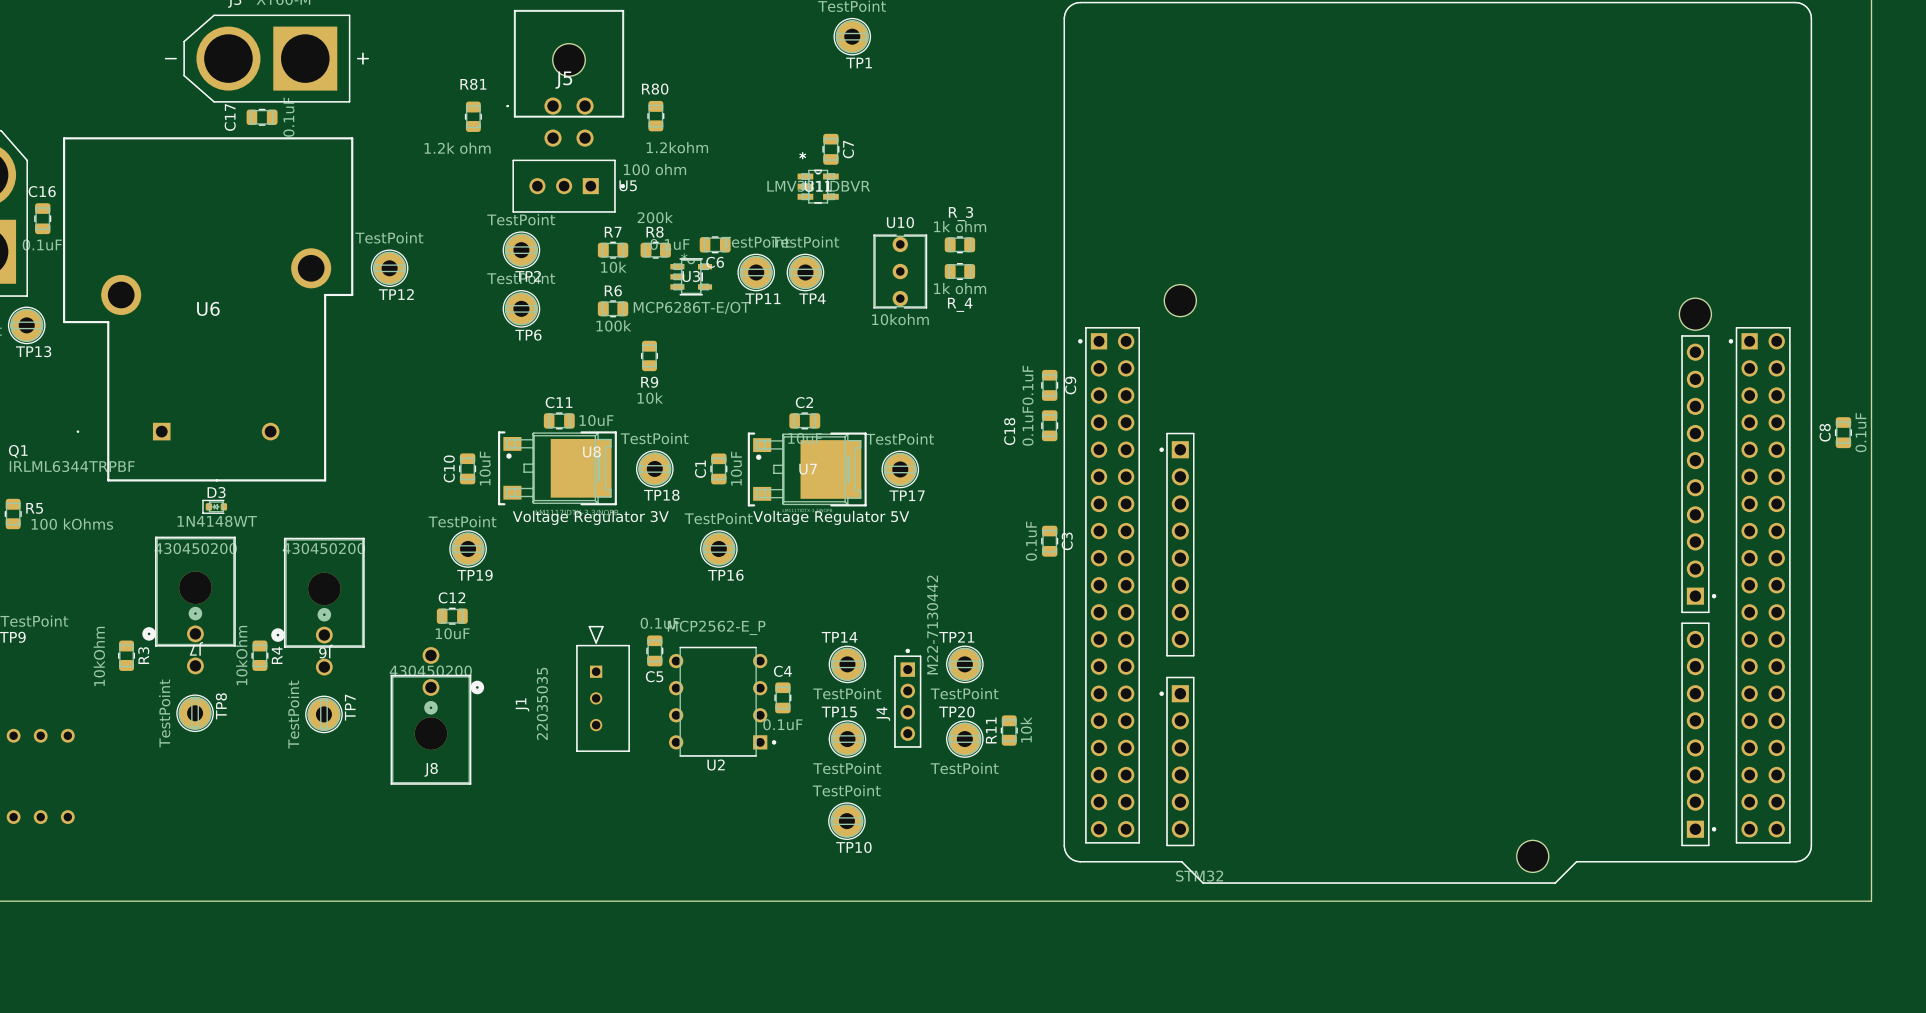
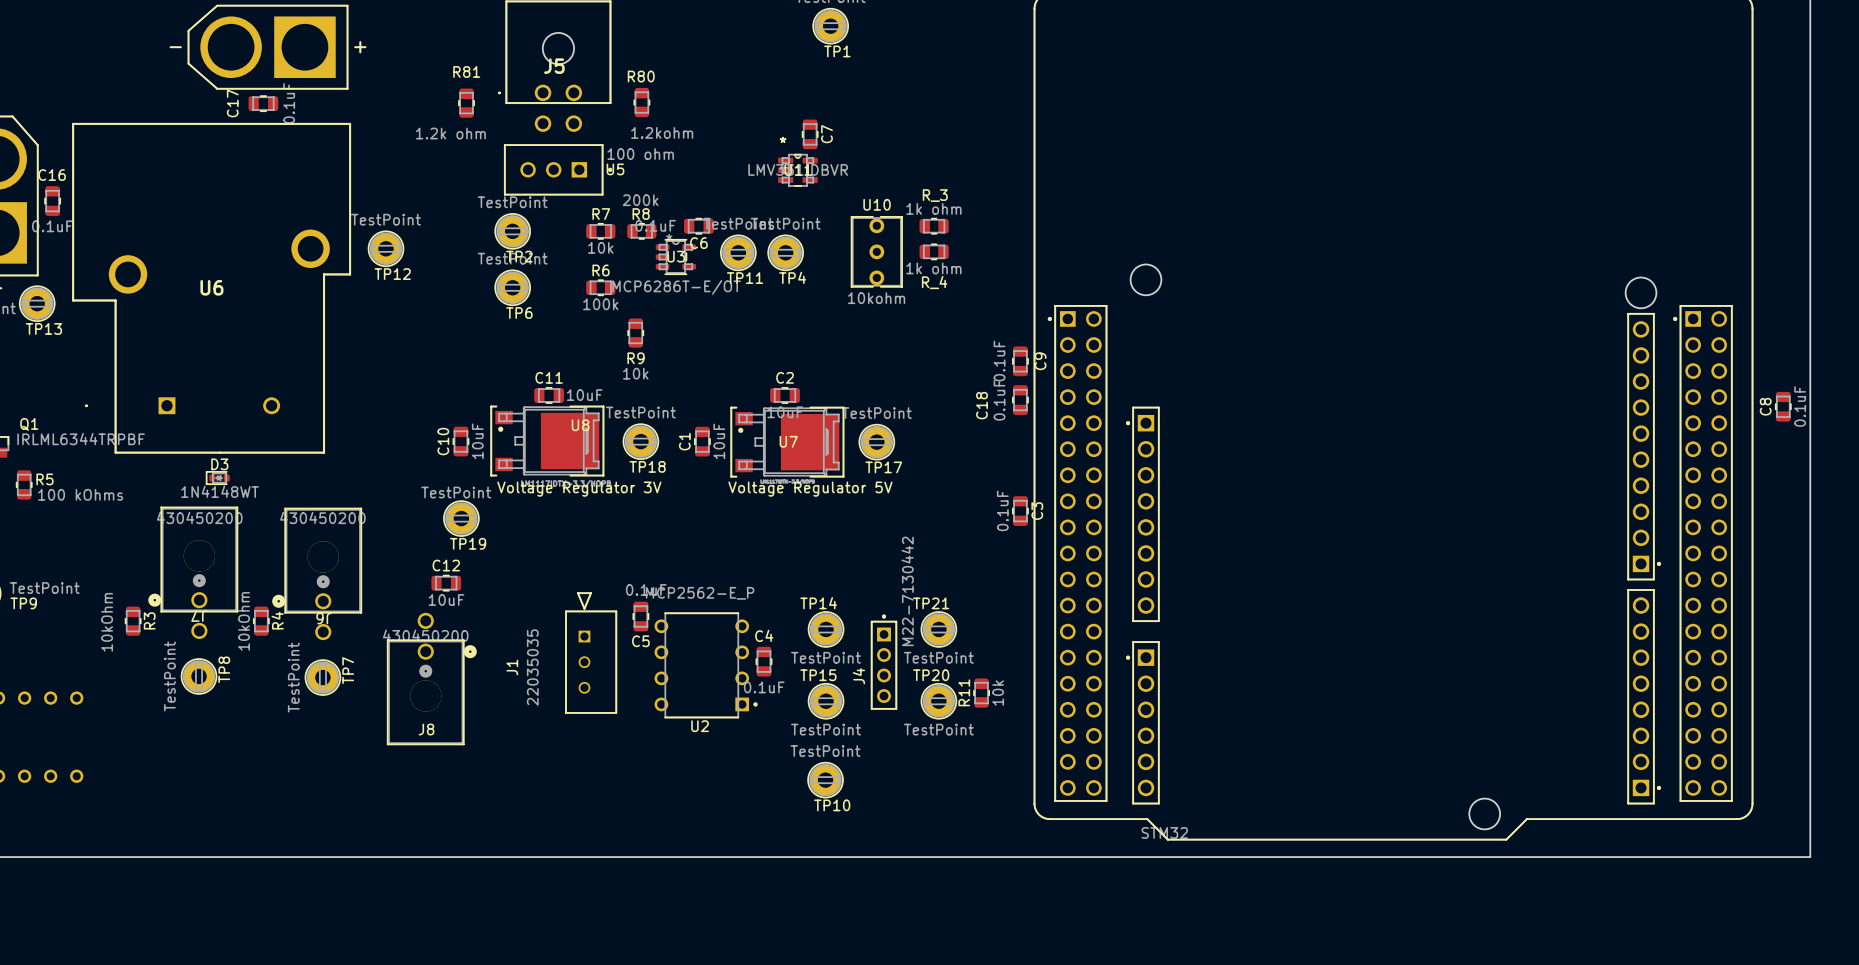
TP16: TestPoint (718, 548) -> none

